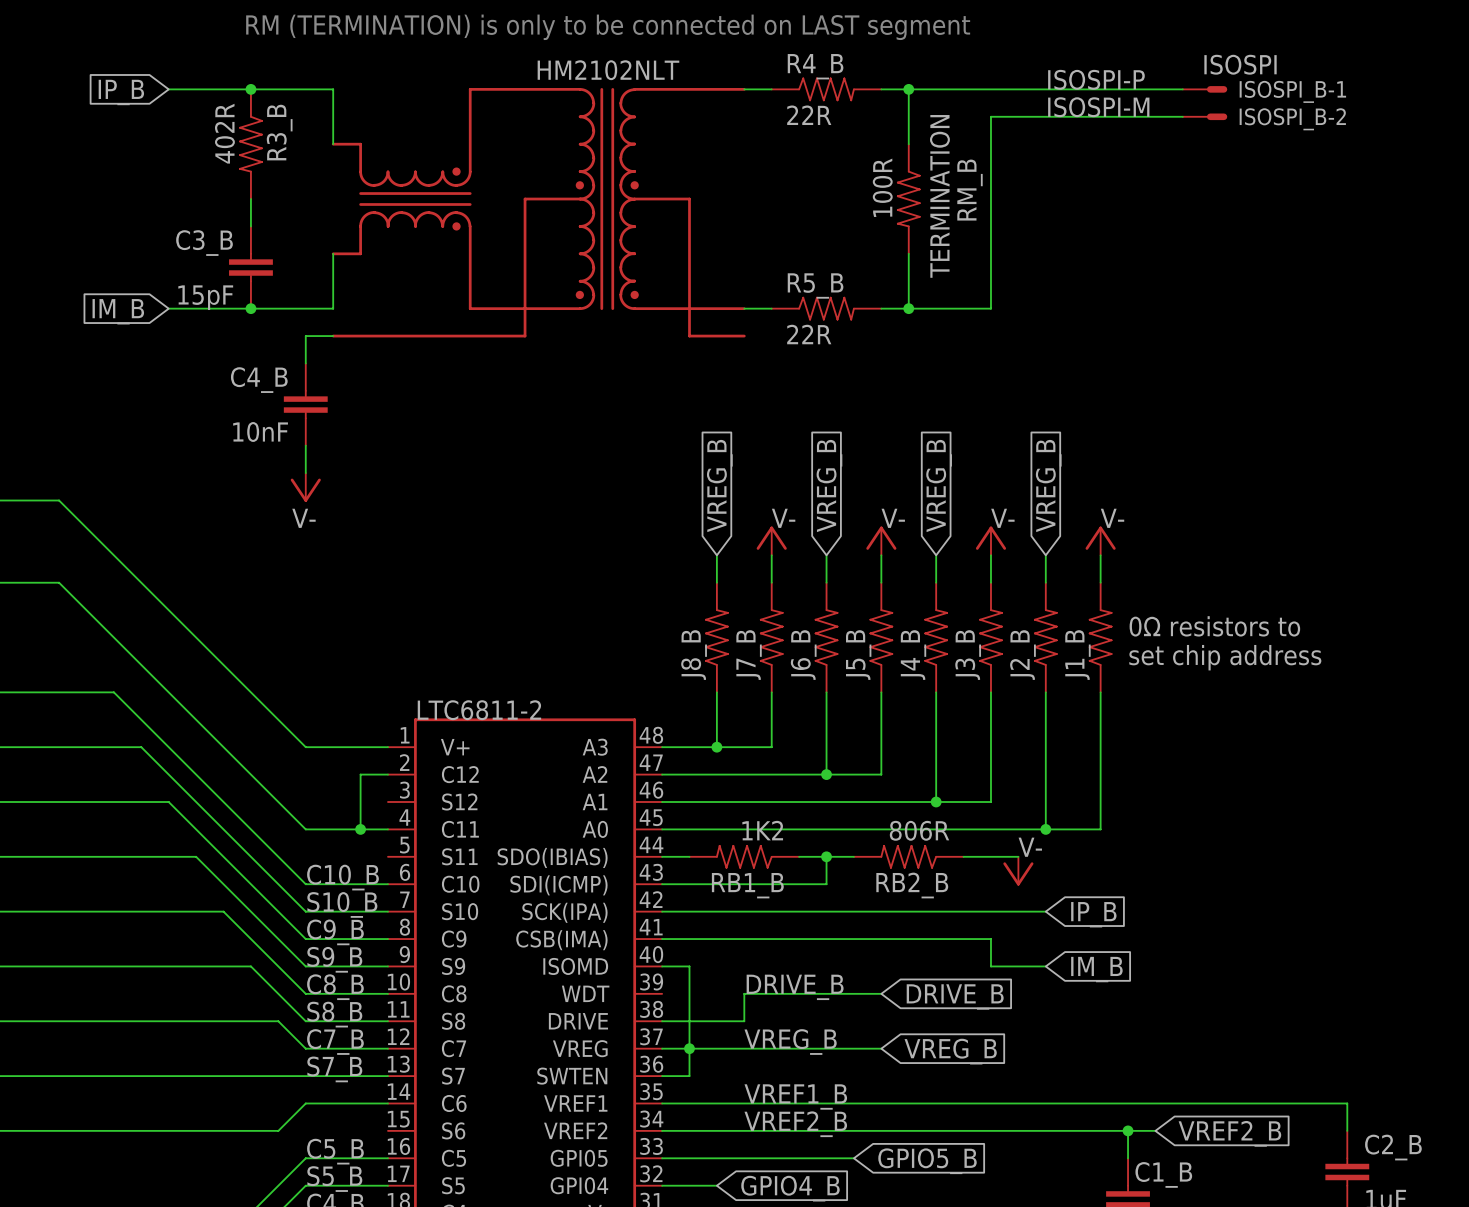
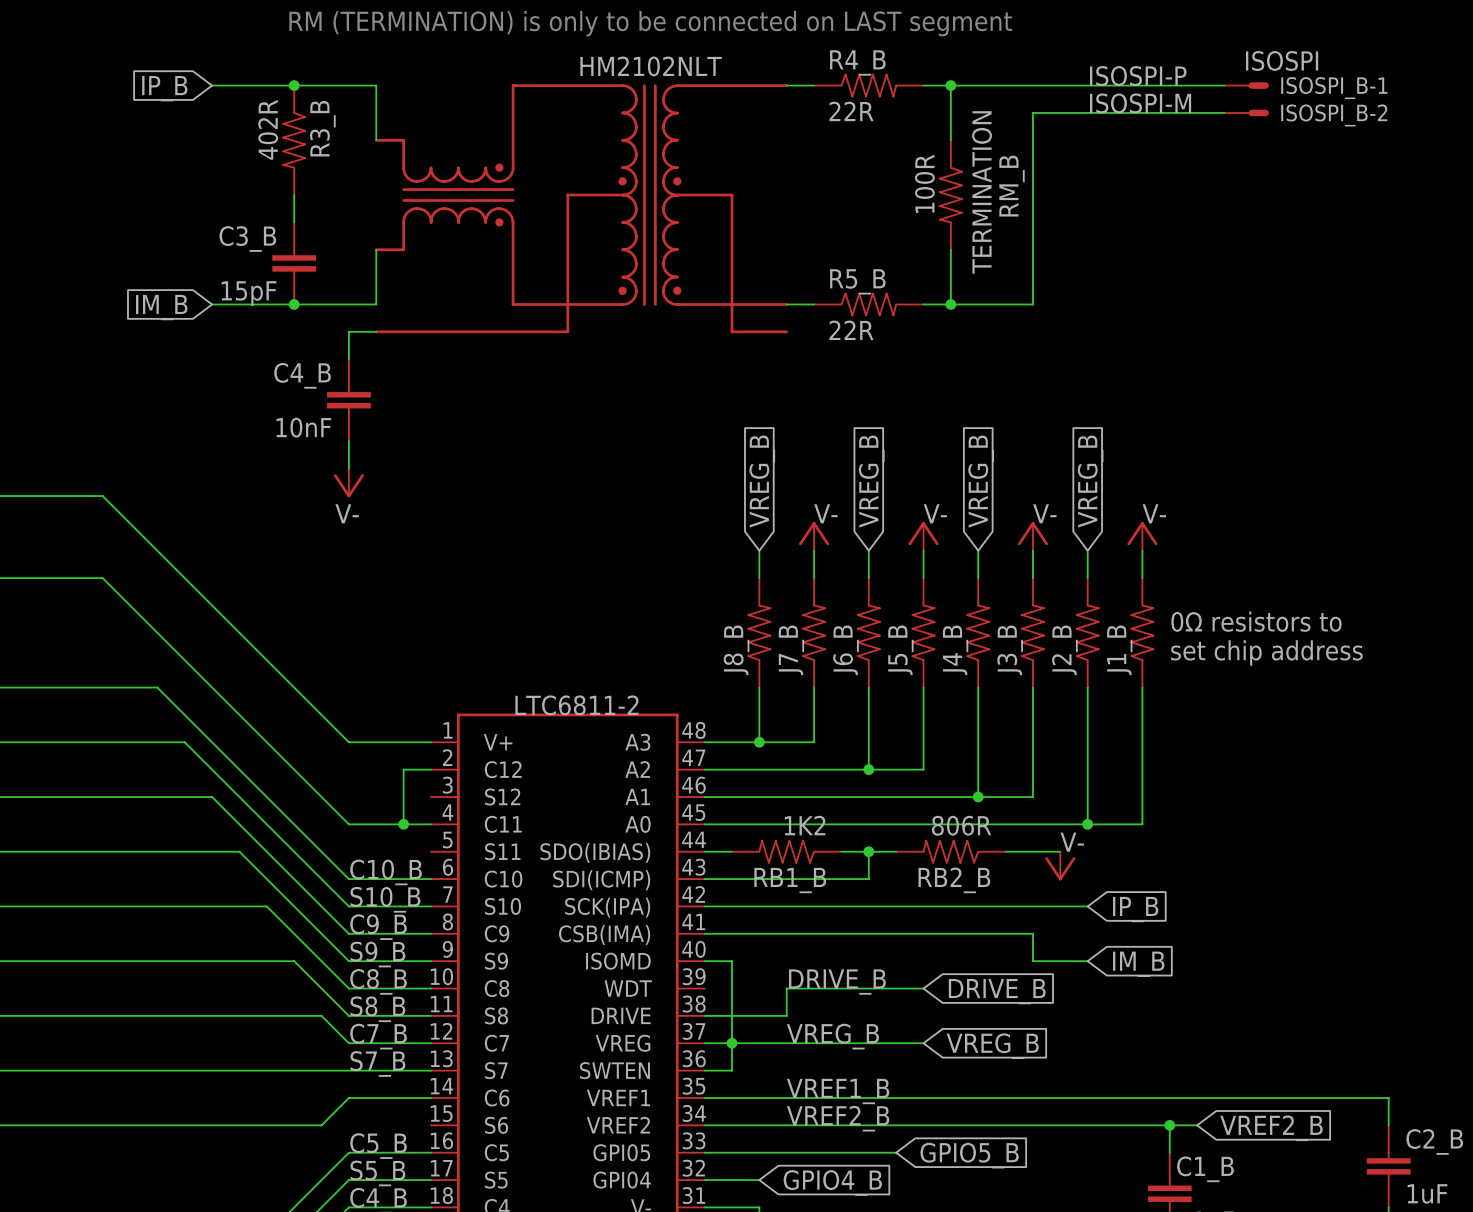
text position: LTC6811-2 (479, 710) -> LTC6811-2 (577, 705)

